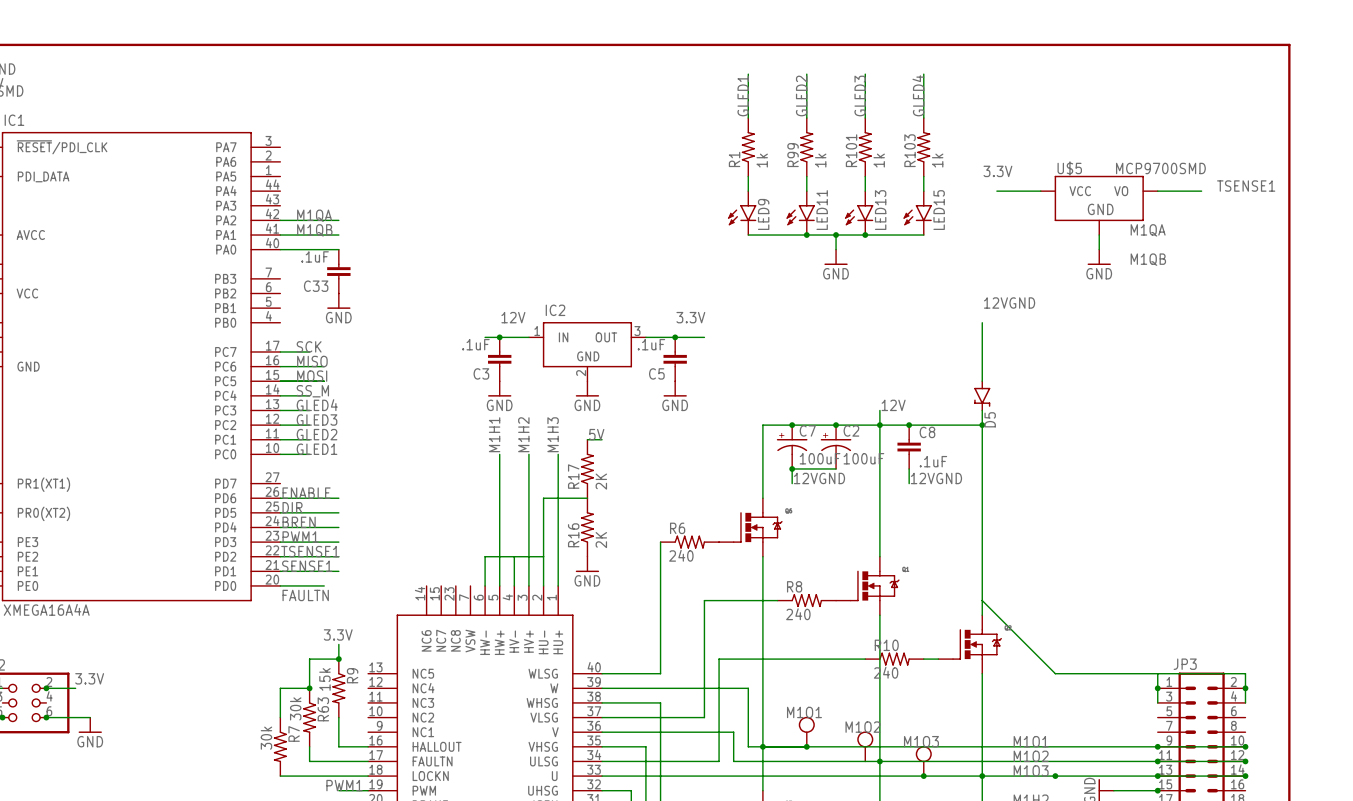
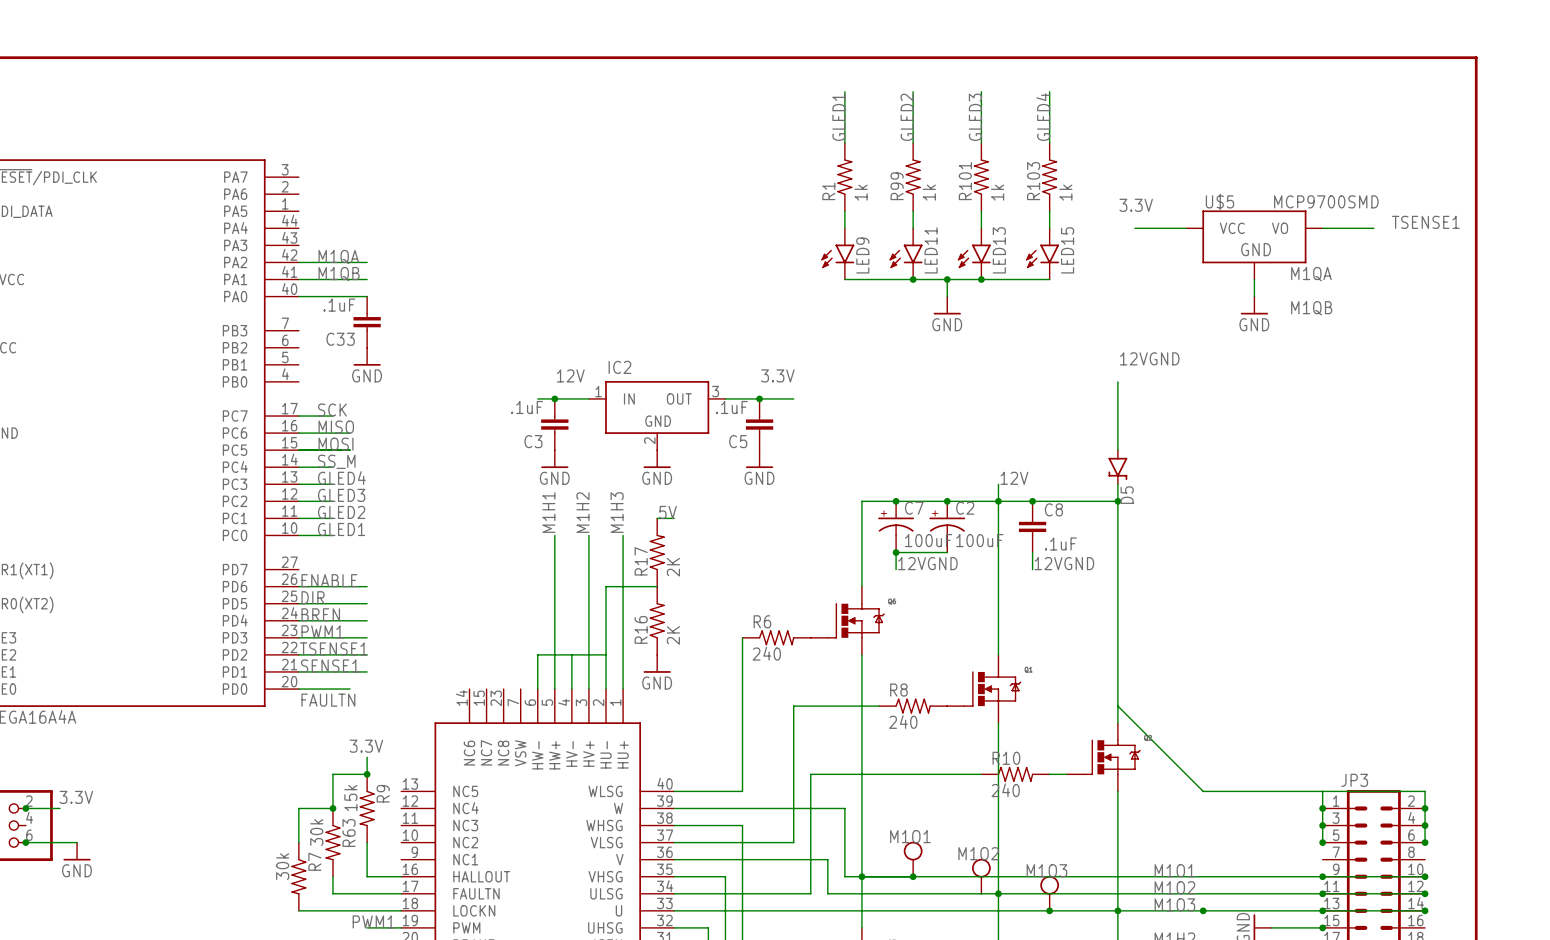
wire: none -> (1322, 825) (1322, 842)
junction: none -> (1322, 825)
wire: none -> (1425, 825) (1425, 842)
junction: none -> (1425, 825)
junction: none -> (1322, 842)
junction: none -> (1425, 842)

